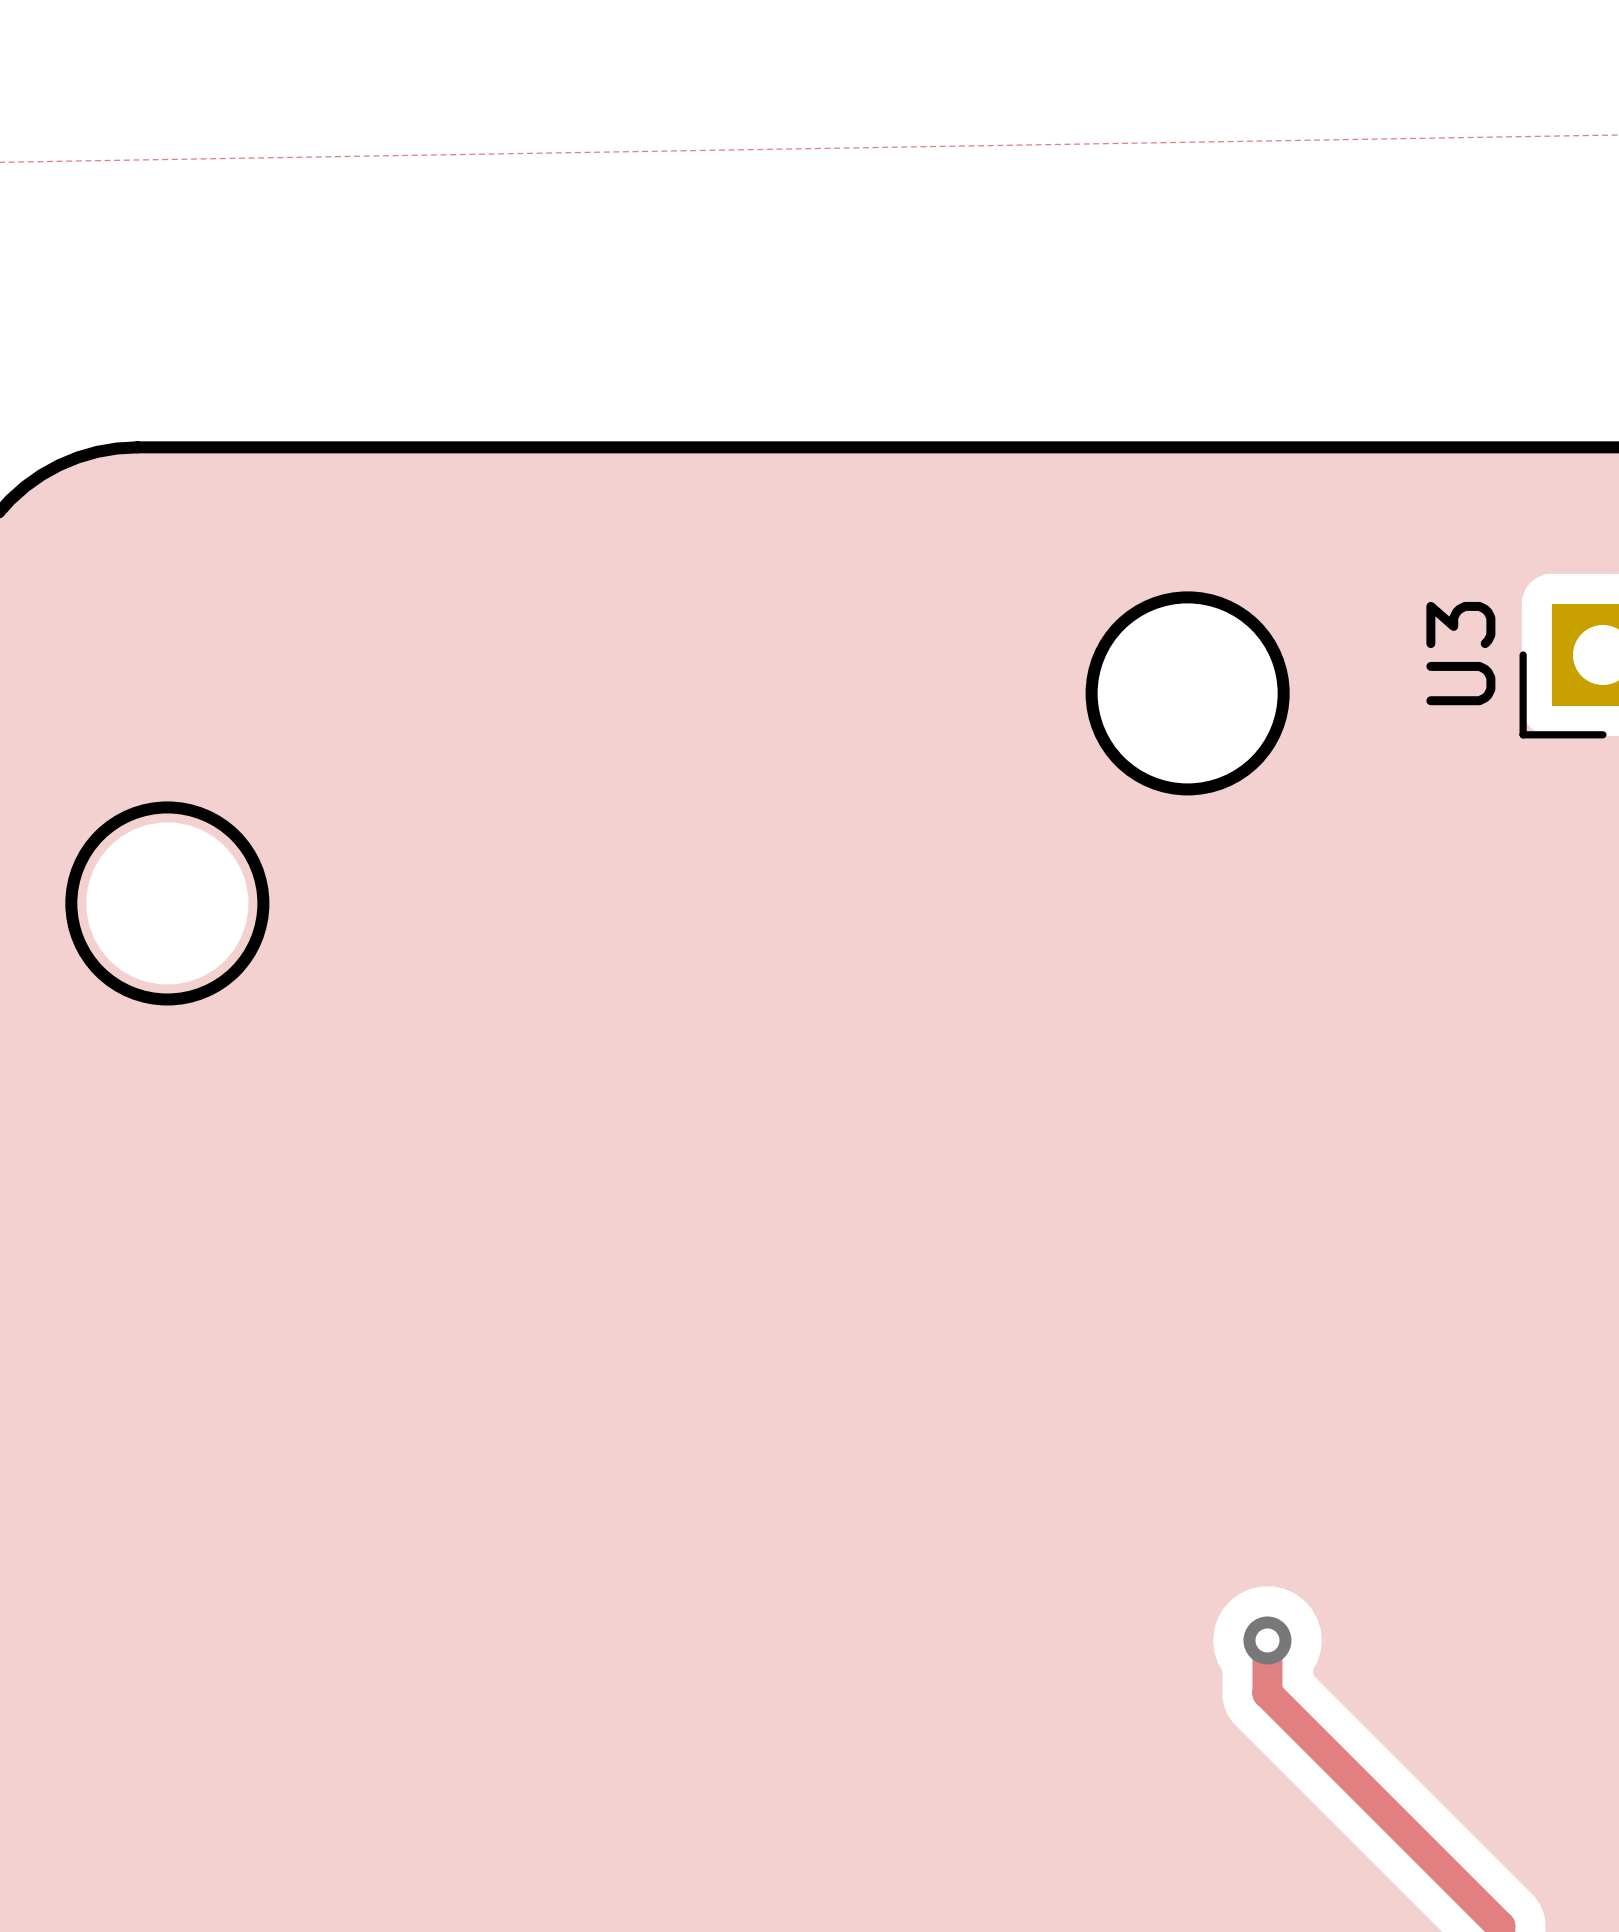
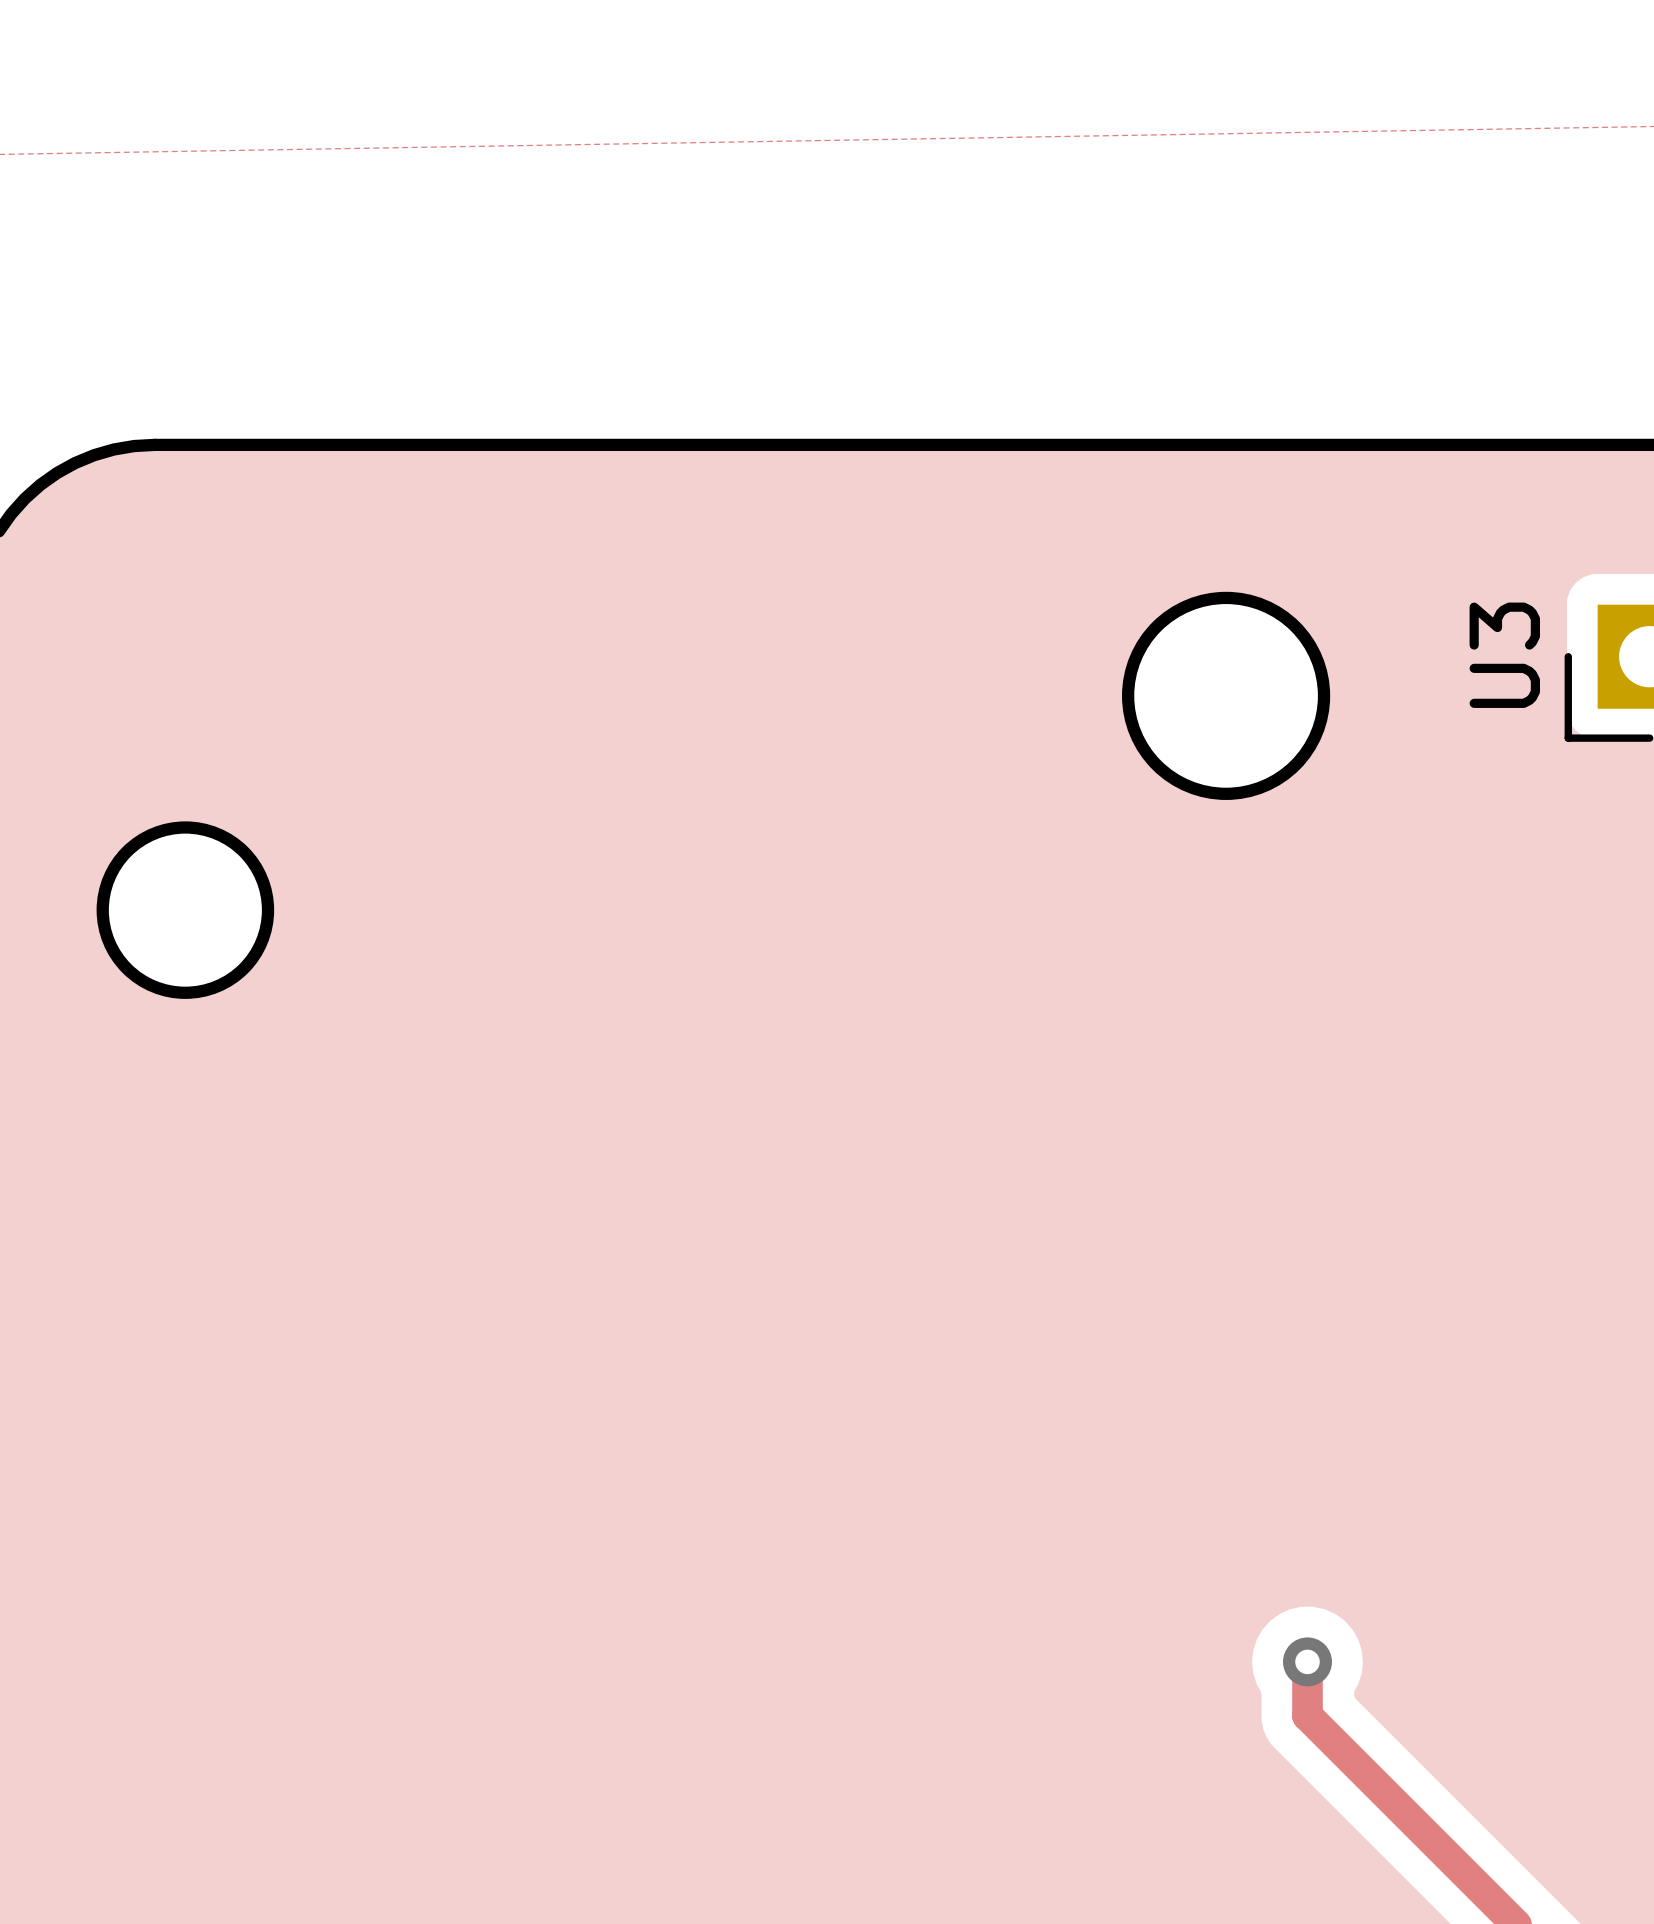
round board edge size: [65, 801, 270, 1006] -> [96, 821, 275, 999]

